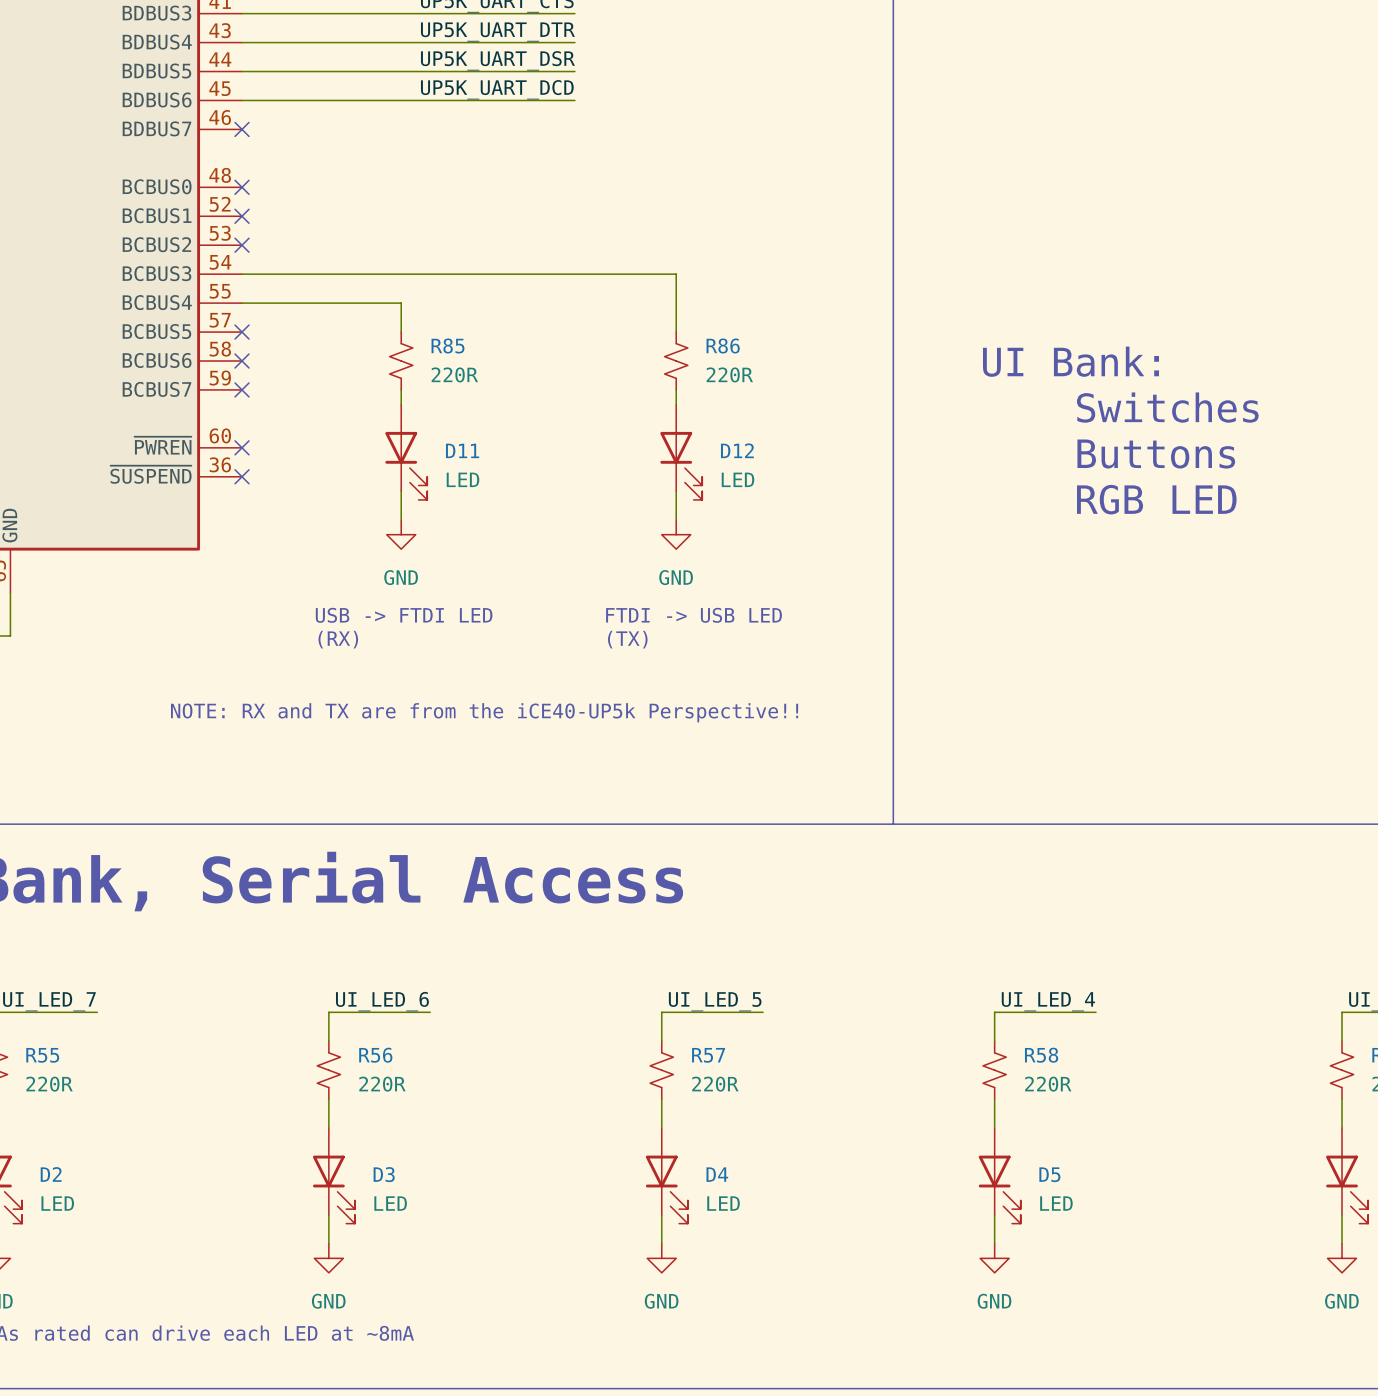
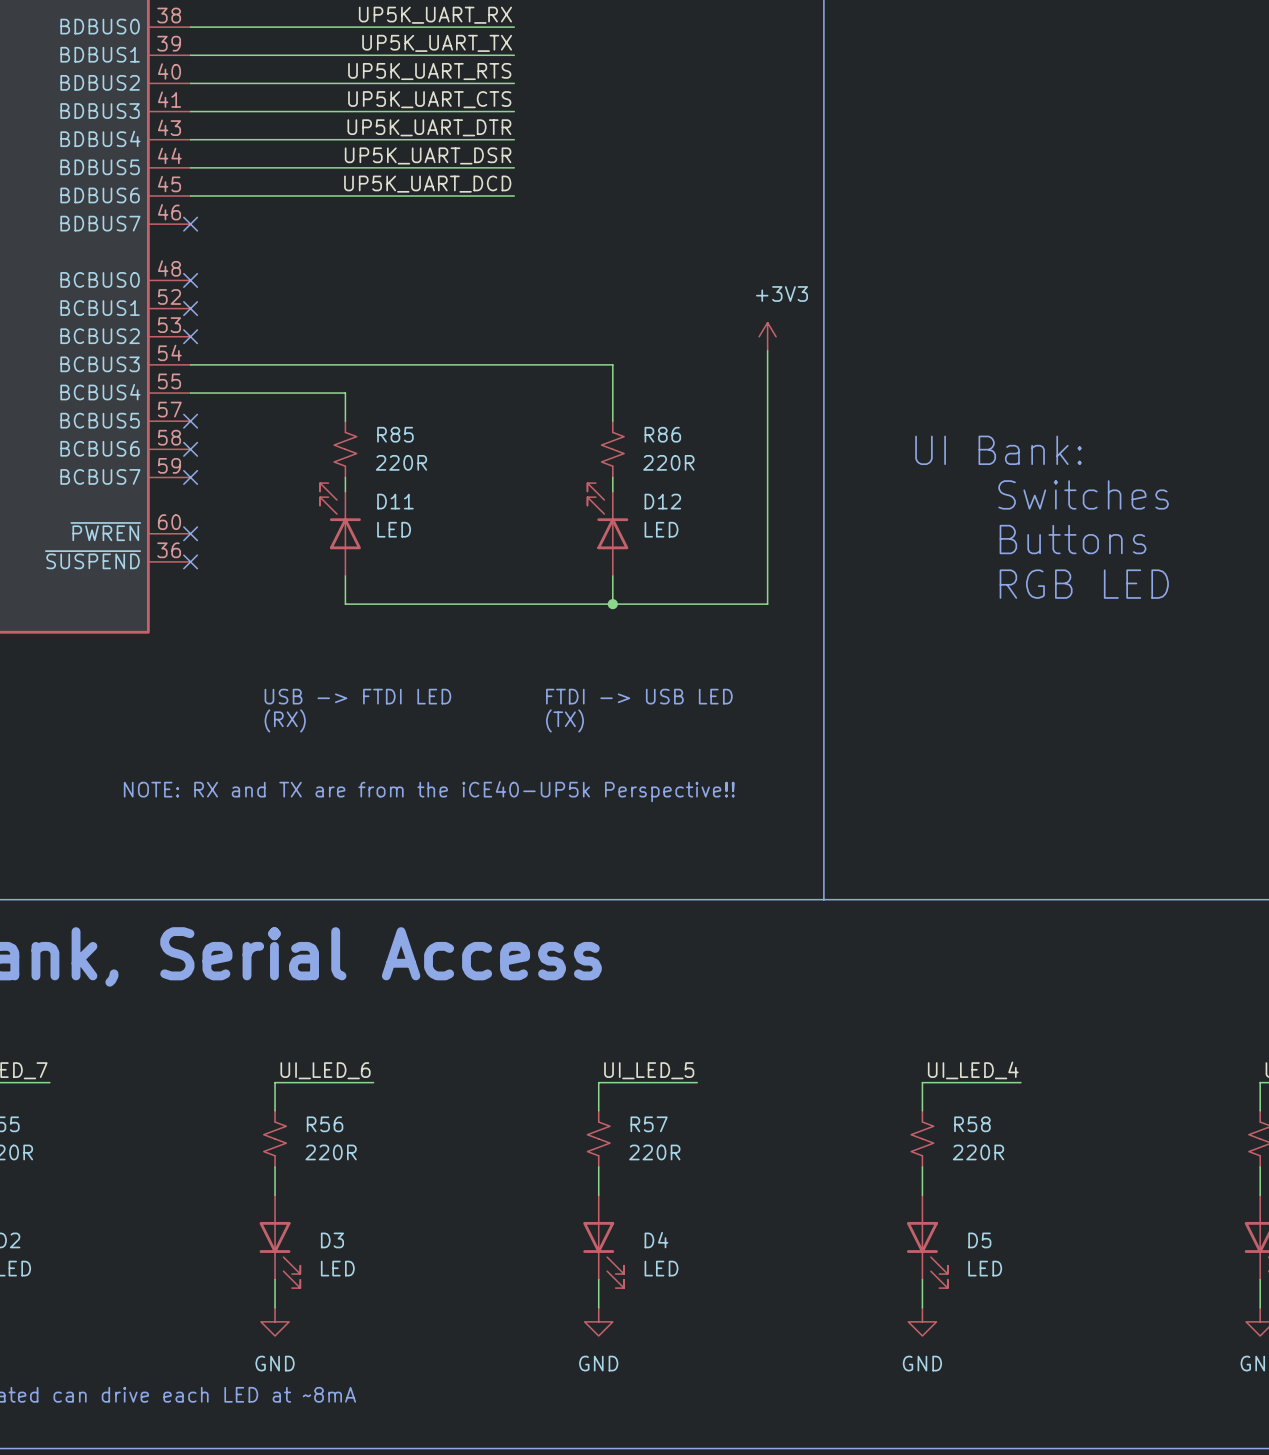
power symbol: none -> +3V3 (767, 336)
wire: none -> (767, 350) (767, 604) (345, 604)
D11 name position: D11 (462, 450) -> D11 (395, 501)
D12 name position: D12 (737, 450) -> D12 (662, 501)
D11 rotation: 0° (406, 465) -> 180° (340, 516)
D12 rotation: 0° (681, 465) -> 180° (607, 516)
D11 value position: LED (463, 479) -> LED (394, 529)
D12 value position: LED (738, 479) -> LED (661, 529)
junction: none -> (612, 604)
power symbol: GND (401, 534) -> none
power symbol: GND (676, 534) -> none

